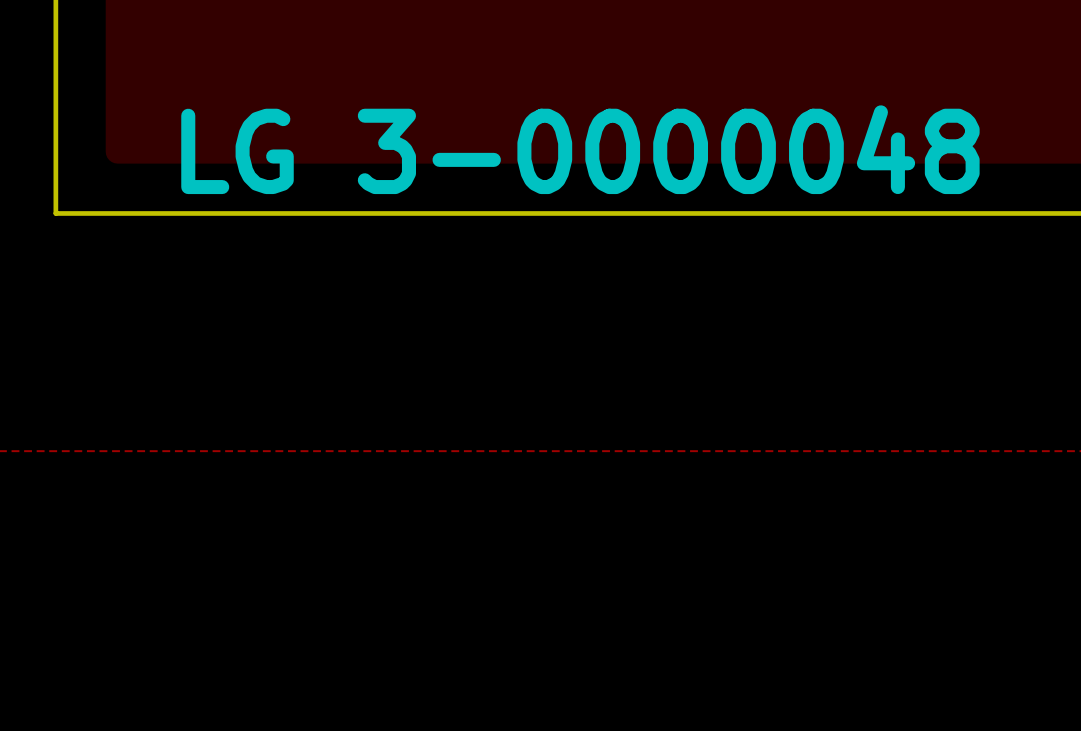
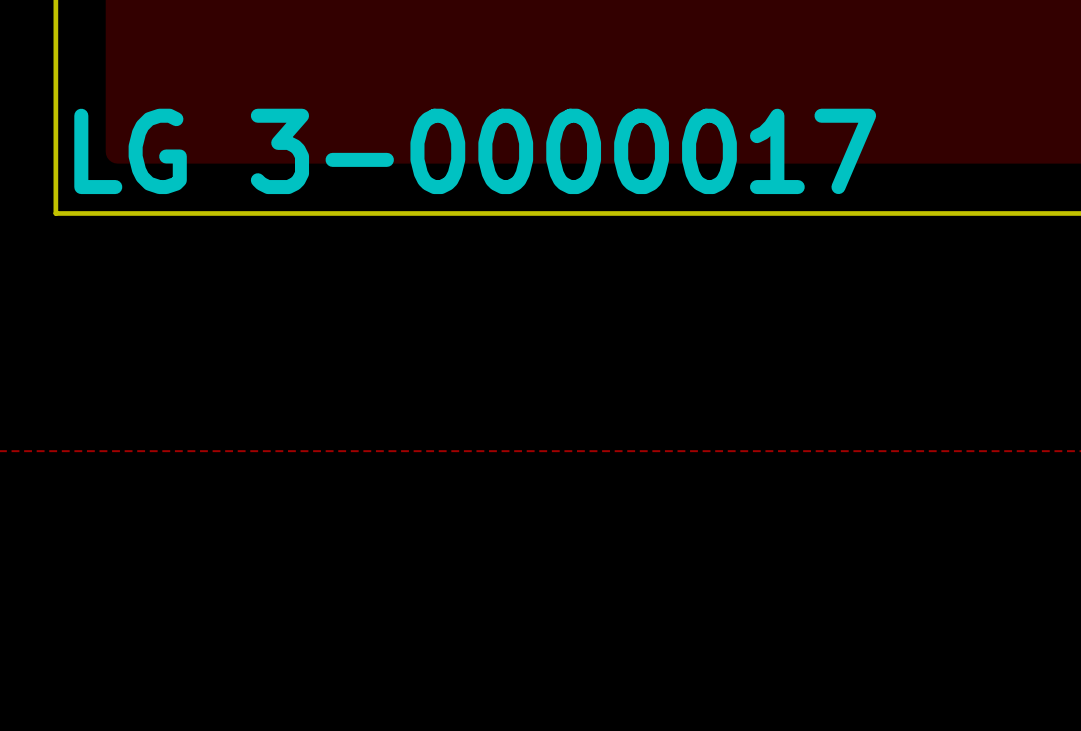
text: LG 3-0000048 (580, 149) -> LG 3-0000017 (475, 151)

